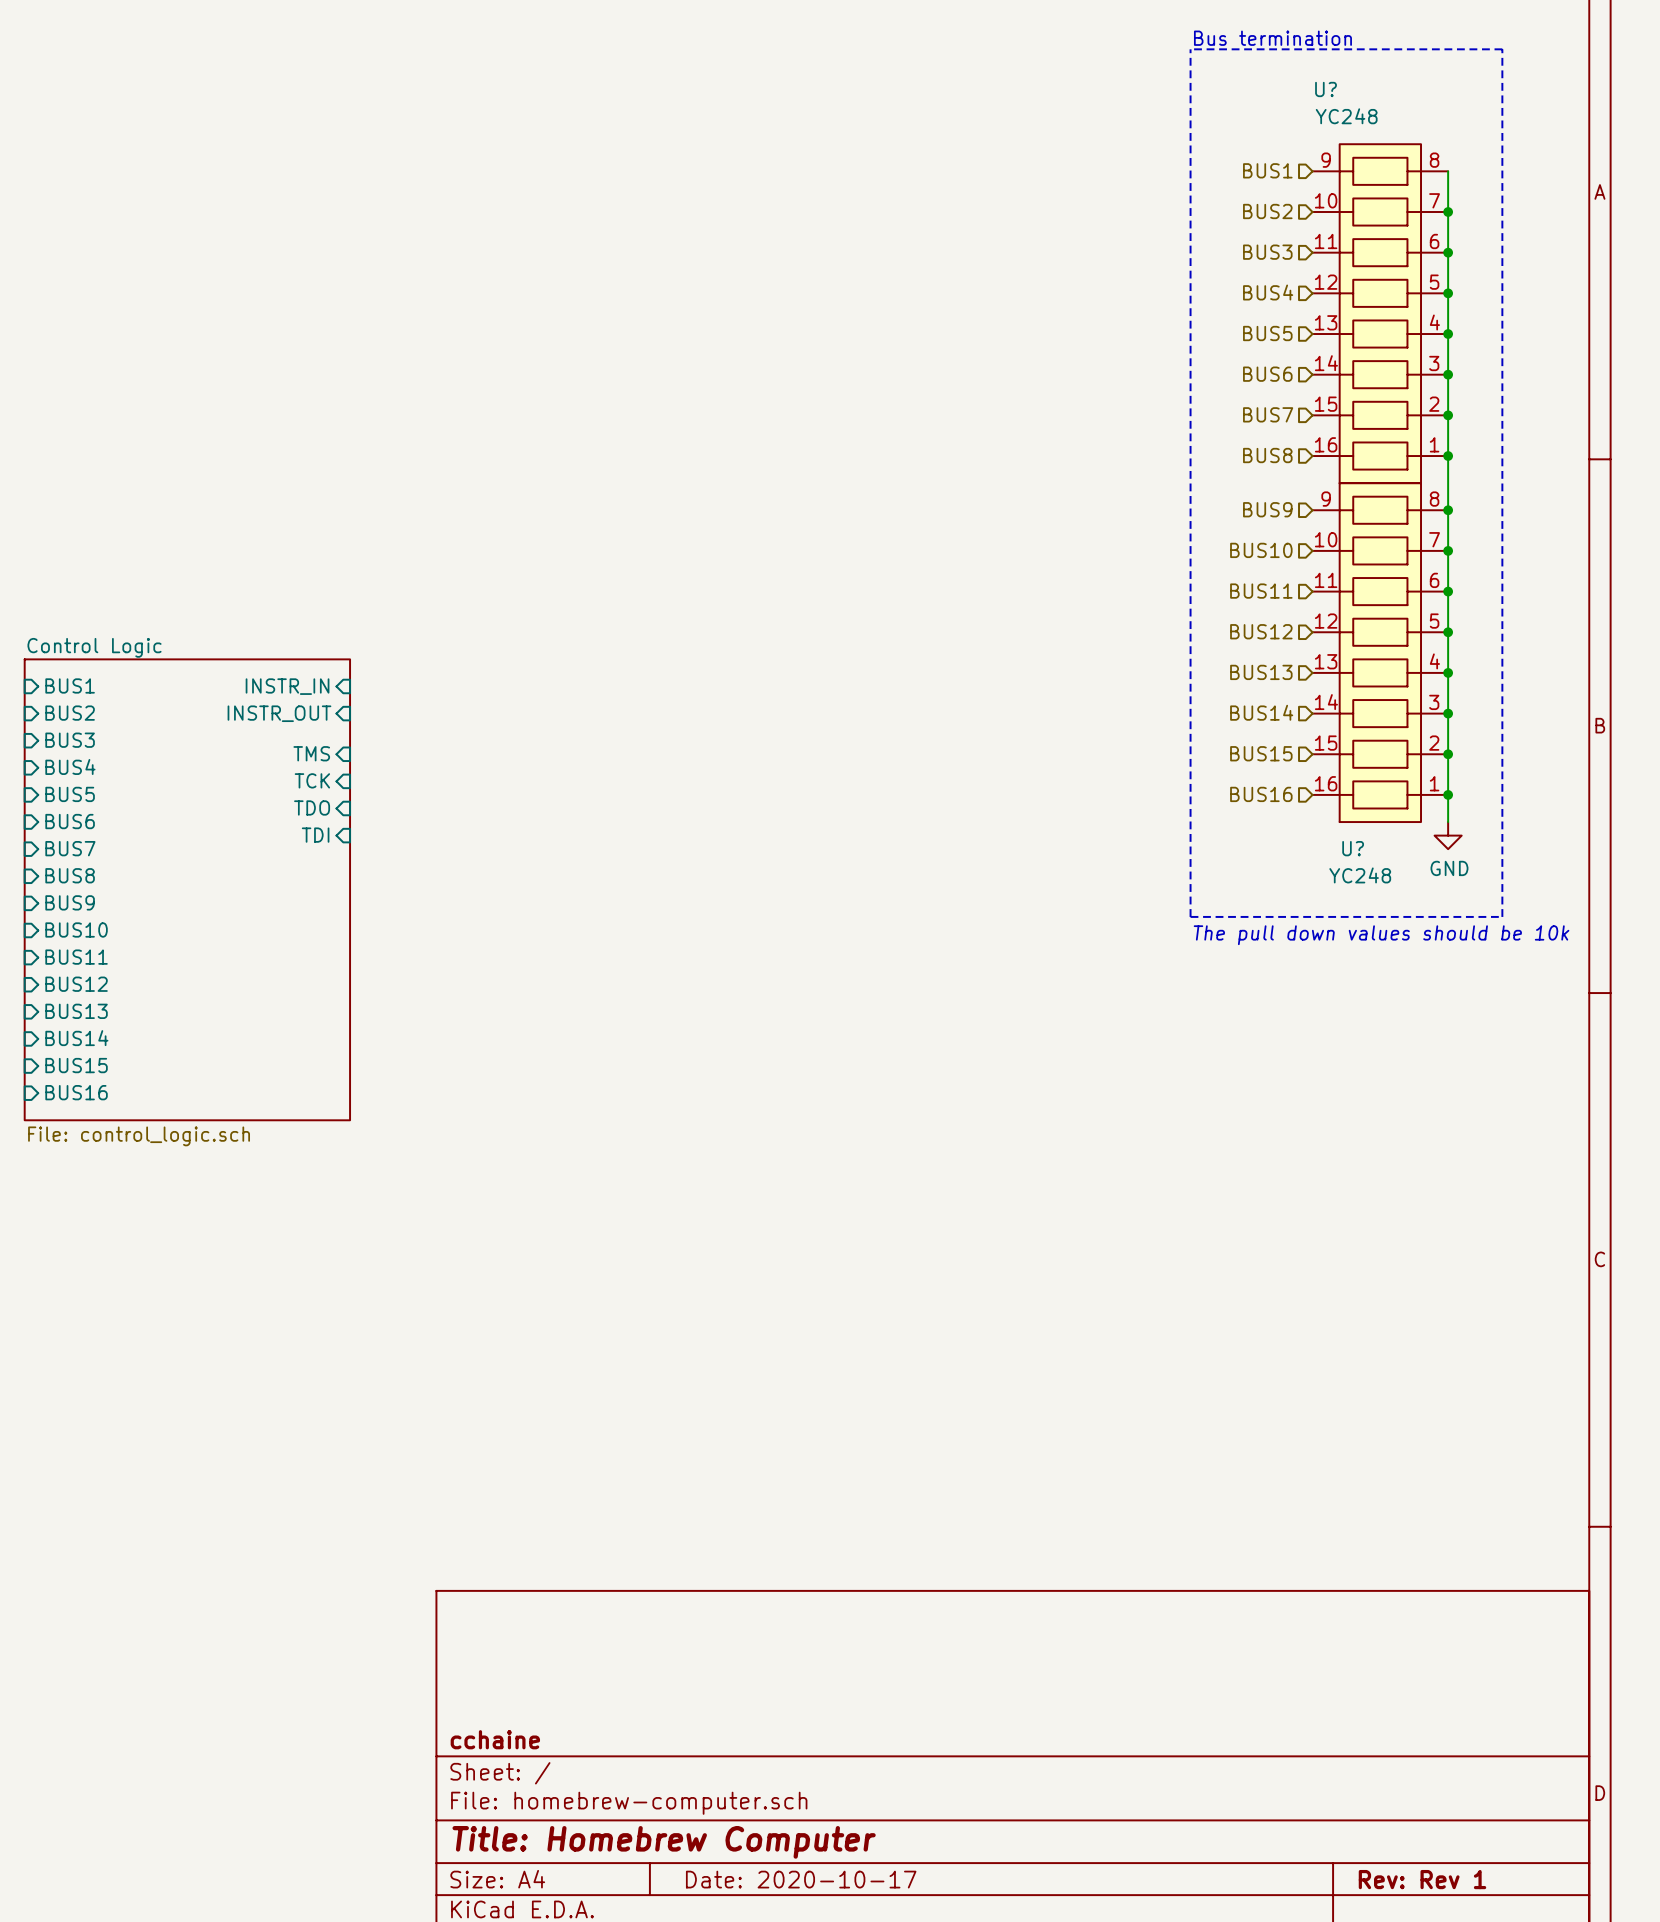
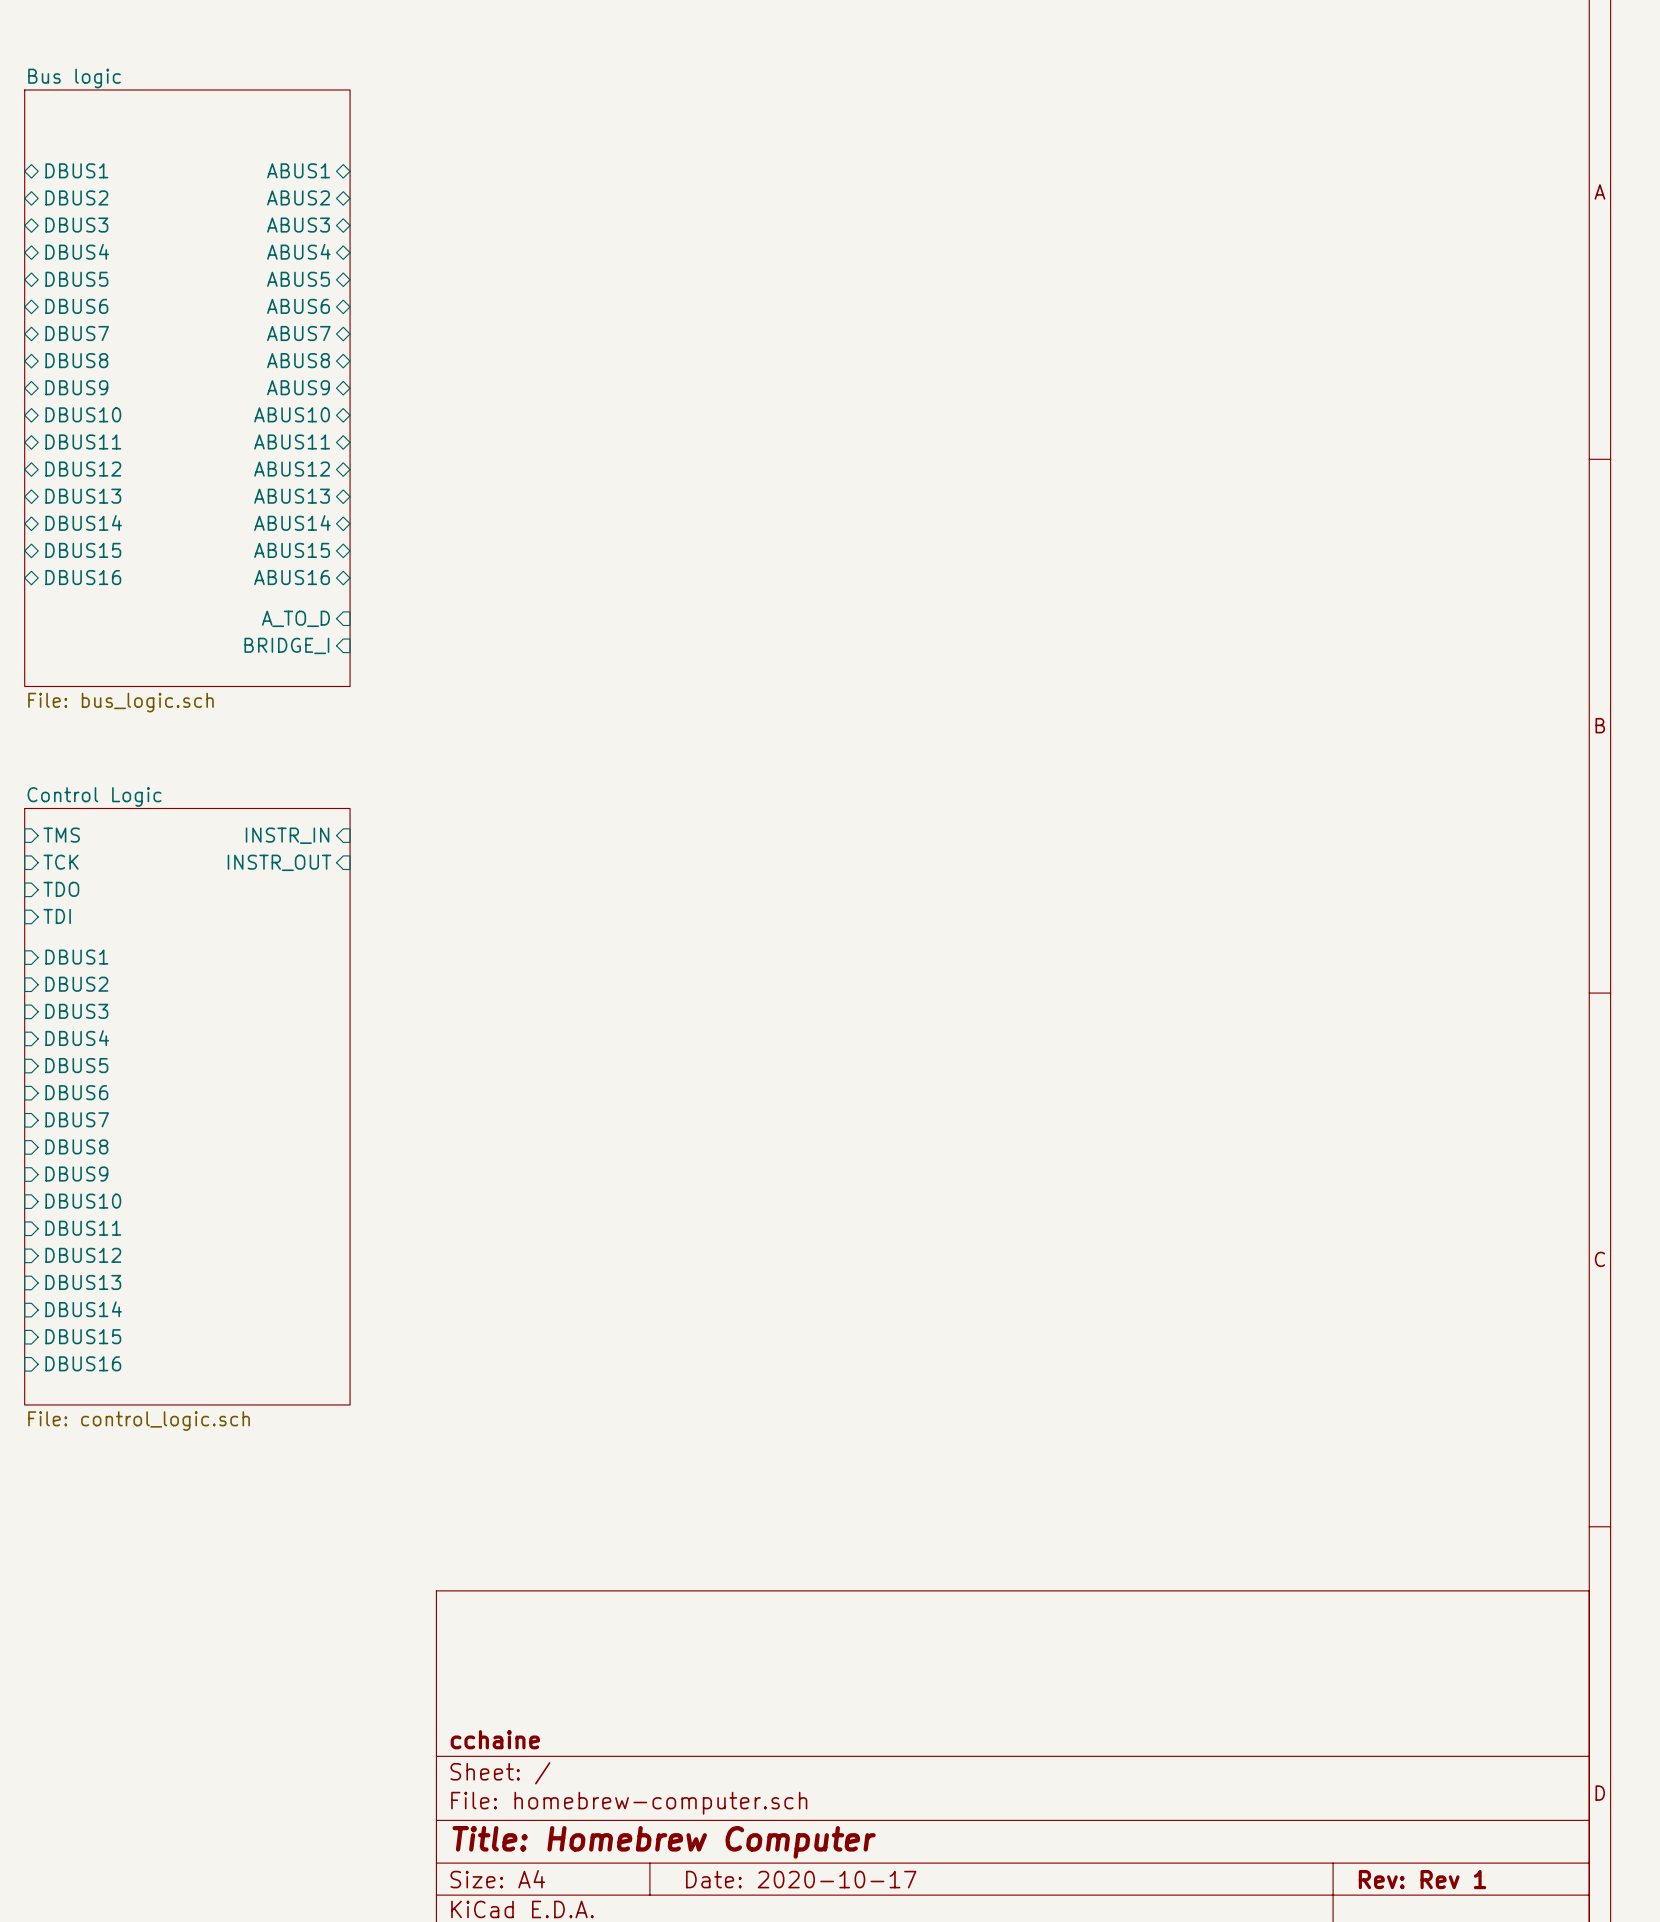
text: Bus termination (1272, 38) -> none
line: (1190, 49) (1190, 916) (1502, 916) (1502, 49) (1190, 49) -> none
sheet pin: none -> DBUS1 (76, 170)
sheet pin: none -> ABUS1 (298, 170)
hierarchical label: BUS1 (1267, 170) -> none
wire: (1448, 171) (1448, 822) -> none
sheet pin: none -> DBUS2 (76, 197)
sheet pin: none -> ABUS2 (298, 197)
hierarchical label: BUS2 (1267, 211) -> none
junction: (1448, 212) -> none
sheet pin: none -> DBUS3 (76, 225)
sheet pin: none -> ABUS3 (298, 225)
sheet pin: none -> DBUS4 (77, 251)
sheet pin: none -> ABUS4 (298, 251)
hierarchical label: BUS3 (1267, 252) -> none
junction: (1448, 252) -> none
sheet pin: none -> DBUS5 (76, 279)
sheet pin: none -> ABUS5 (298, 279)
hierarchical label: BUS4 (1268, 292) -> none
junction: (1448, 293) -> none
sheet pin: none -> DBUS6 (76, 306)
sheet pin: none -> ABUS6 (298, 306)
U?: YC248 (1380, 313) -> none
sheet pin: none -> DBUS7 (77, 333)
sheet pin: none -> ABUS7 (298, 333)
hierarchical label: BUS5 (1267, 333) -> none
junction: (1448, 334) -> none
sheet pin: none -> DBUS8 (76, 360)
sheet pin: none -> ABUS8 (298, 360)
hierarchical label: BUS6 (1267, 374) -> none
junction: (1448, 374) -> none
sheet pin: none -> DBUS9 (76, 387)
sheet pin: none -> ABUS9 (298, 387)
sheet Bus logic: none -> File: bus_logic.sch (187, 388)
sheet pin: none -> DBUS10 (83, 414)
sheet pin: none -> ABUS10 (292, 414)
hierarchical label: BUS7 (1268, 414) -> none
junction: (1448, 415) -> none
sheet pin: none -> DBUS11 (83, 441)
sheet pin: none -> ABUS11 (292, 441)
hierarchical label: BUS8 (1267, 455) -> none
junction: (1448, 456) -> none
sheet pin: none -> DBUS12 (83, 469)
sheet pin: none -> ABUS12 (292, 469)
sheet pin: none -> DBUS13 (83, 496)
sheet pin: none -> ABUS13 (292, 496)
hierarchical label: BUS9 (1267, 509) -> none
junction: (1448, 510) -> none
sheet pin: none -> DBUS14 (83, 522)
sheet pin: none -> ABUS14 (292, 522)
sheet pin: none -> DBUS15 (83, 550)
sheet pin: none -> ABUS15 (292, 550)
hierarchical label: BUS10 (1261, 550) -> none
junction: (1448, 550) -> none
sheet pin: none -> DBUS16 (83, 577)
sheet pin: none -> ABUS16 (292, 577)
hierarchical label: BUS11 (1261, 591) -> none
junction: (1448, 591) -> none
sheet pin: none -> A_TO_D (295, 618)
hierarchical label: BUS12 (1261, 631) -> none
junction: (1448, 632) -> none
sheet pin: none -> BRIDGE_I (286, 645)
U?: YC248 (1380, 652) -> none
hierarchical label: BUS13 (1261, 672) -> none
junction: (1448, 672) -> none
sheet pin: BUS1 (70, 685) -> none
sheet pin: INSTR_IN (287, 686) -> none
hierarchical label: BUS14 (1261, 712) -> none
sheet pin: BUS2 (70, 713) -> none
sheet pin position: INSTR_OUT (279, 713) -> INSTR_OUT (279, 862)
junction: (1448, 713) -> none
sheet pin: BUS3 (70, 740) -> none
sheet pin: TMS (311, 753) -> none
hierarchical label: BUS15 (1261, 753) -> none
junction: (1448, 754) -> none
sheet pin: BUS4 (70, 766) -> none
sheet pin: TCK (312, 780) -> none
sheet pin: BUS5 (70, 794) -> none
hierarchical label: BUS16 (1261, 794) -> none
junction: (1448, 794) -> none
sheet pin: TDO (312, 807) -> none
sheet pin: BUS6 (70, 821) -> none
sheet pin: none -> TMS (61, 835)
sheet pin: TDI (315, 835) -> INSTR_IN (287, 835)
power symbol: GND (1448, 835) -> none
sheet pin: BUS7 (70, 848) -> none
sheet pin: none -> TCK (61, 862)
sheet pin: BUS8 (70, 875) -> none
sheet pin: none -> TDO (61, 889)
sheet Control Logic: File: control_logic.sch (187, 889) -> none
sheet pin: BUS9 (70, 902) -> none
sheet pin: none -> TDI (57, 916)
sheet pin: BUS10 (76, 929) -> none
text: The pull down values should be 10k (1381, 935) -> none
sheet pin: BUS11 (76, 957) -> DBUS1 (76, 957)
sheet pin: BUS12 (76, 984) -> DBUS2 (76, 984)
sheet pin: BUS13 (76, 1011) -> DBUS3 (76, 1011)
sheet pin: BUS14 (76, 1038) -> DBUS4 (77, 1038)
sheet pin: BUS15 (76, 1065) -> DBUS5 (76, 1065)
sheet pin: BUS16 (76, 1092) -> DBUS6 (76, 1092)
sheet Control Logic: none -> File: control_logic.sch (187, 1106)
sheet pin: none -> DBUS7 (77, 1119)
sheet pin: none -> DBUS8 (76, 1146)
sheet pin: none -> DBUS9 (76, 1174)
sheet pin: none -> DBUS10 (83, 1201)
sheet pin: none -> DBUS11 (83, 1228)
sheet pin: none -> DBUS12 (83, 1255)
sheet pin: none -> DBUS13 (83, 1282)
sheet pin: none -> DBUS14 (83, 1309)
sheet pin: none -> DBUS15 (83, 1336)
sheet pin: none -> DBUS16 (83, 1363)

